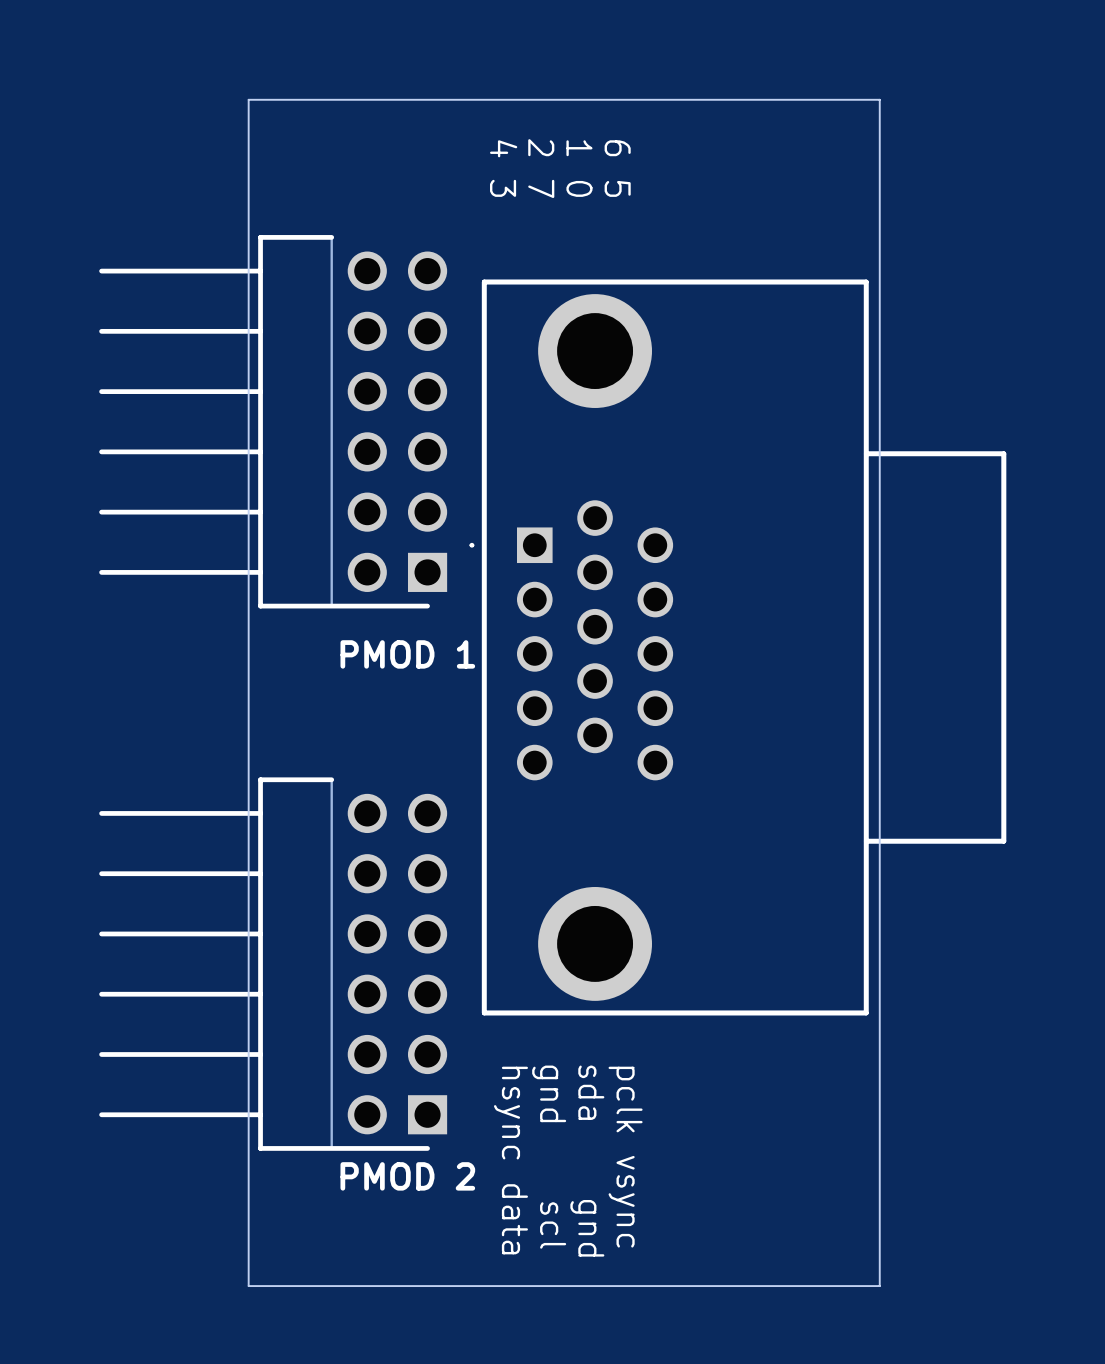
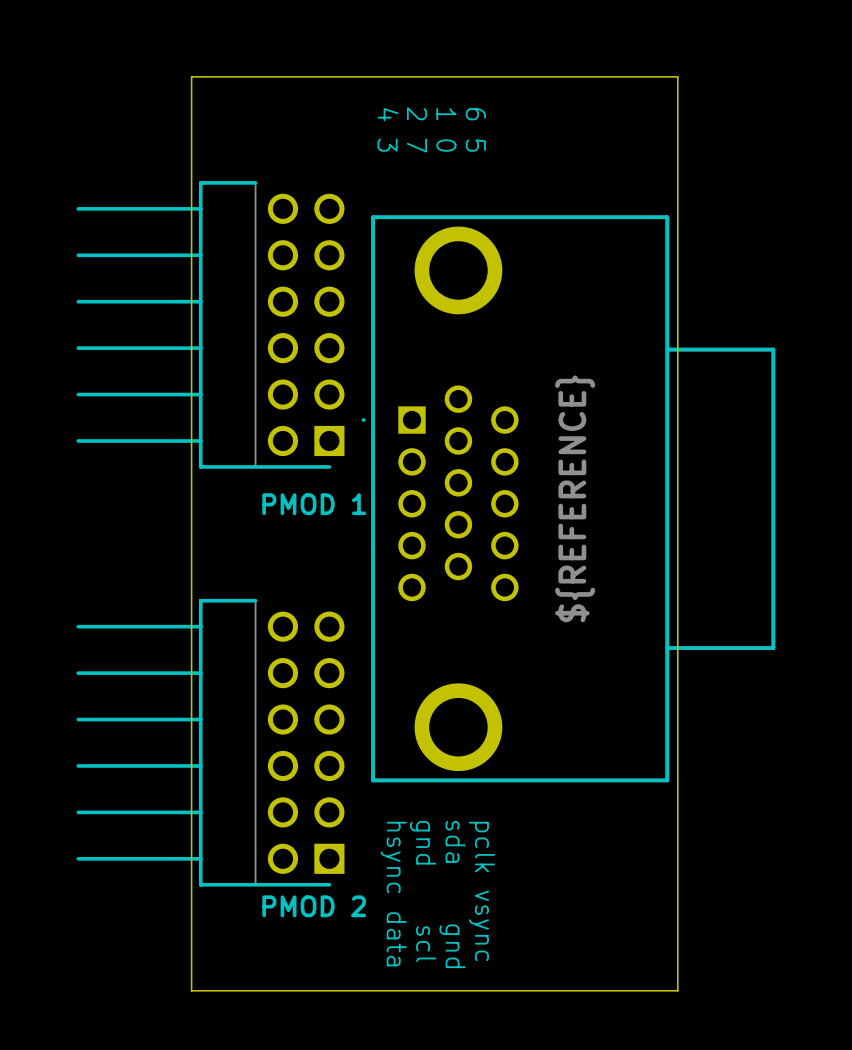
text: none -> ${REFERENCE} (575, 498)

